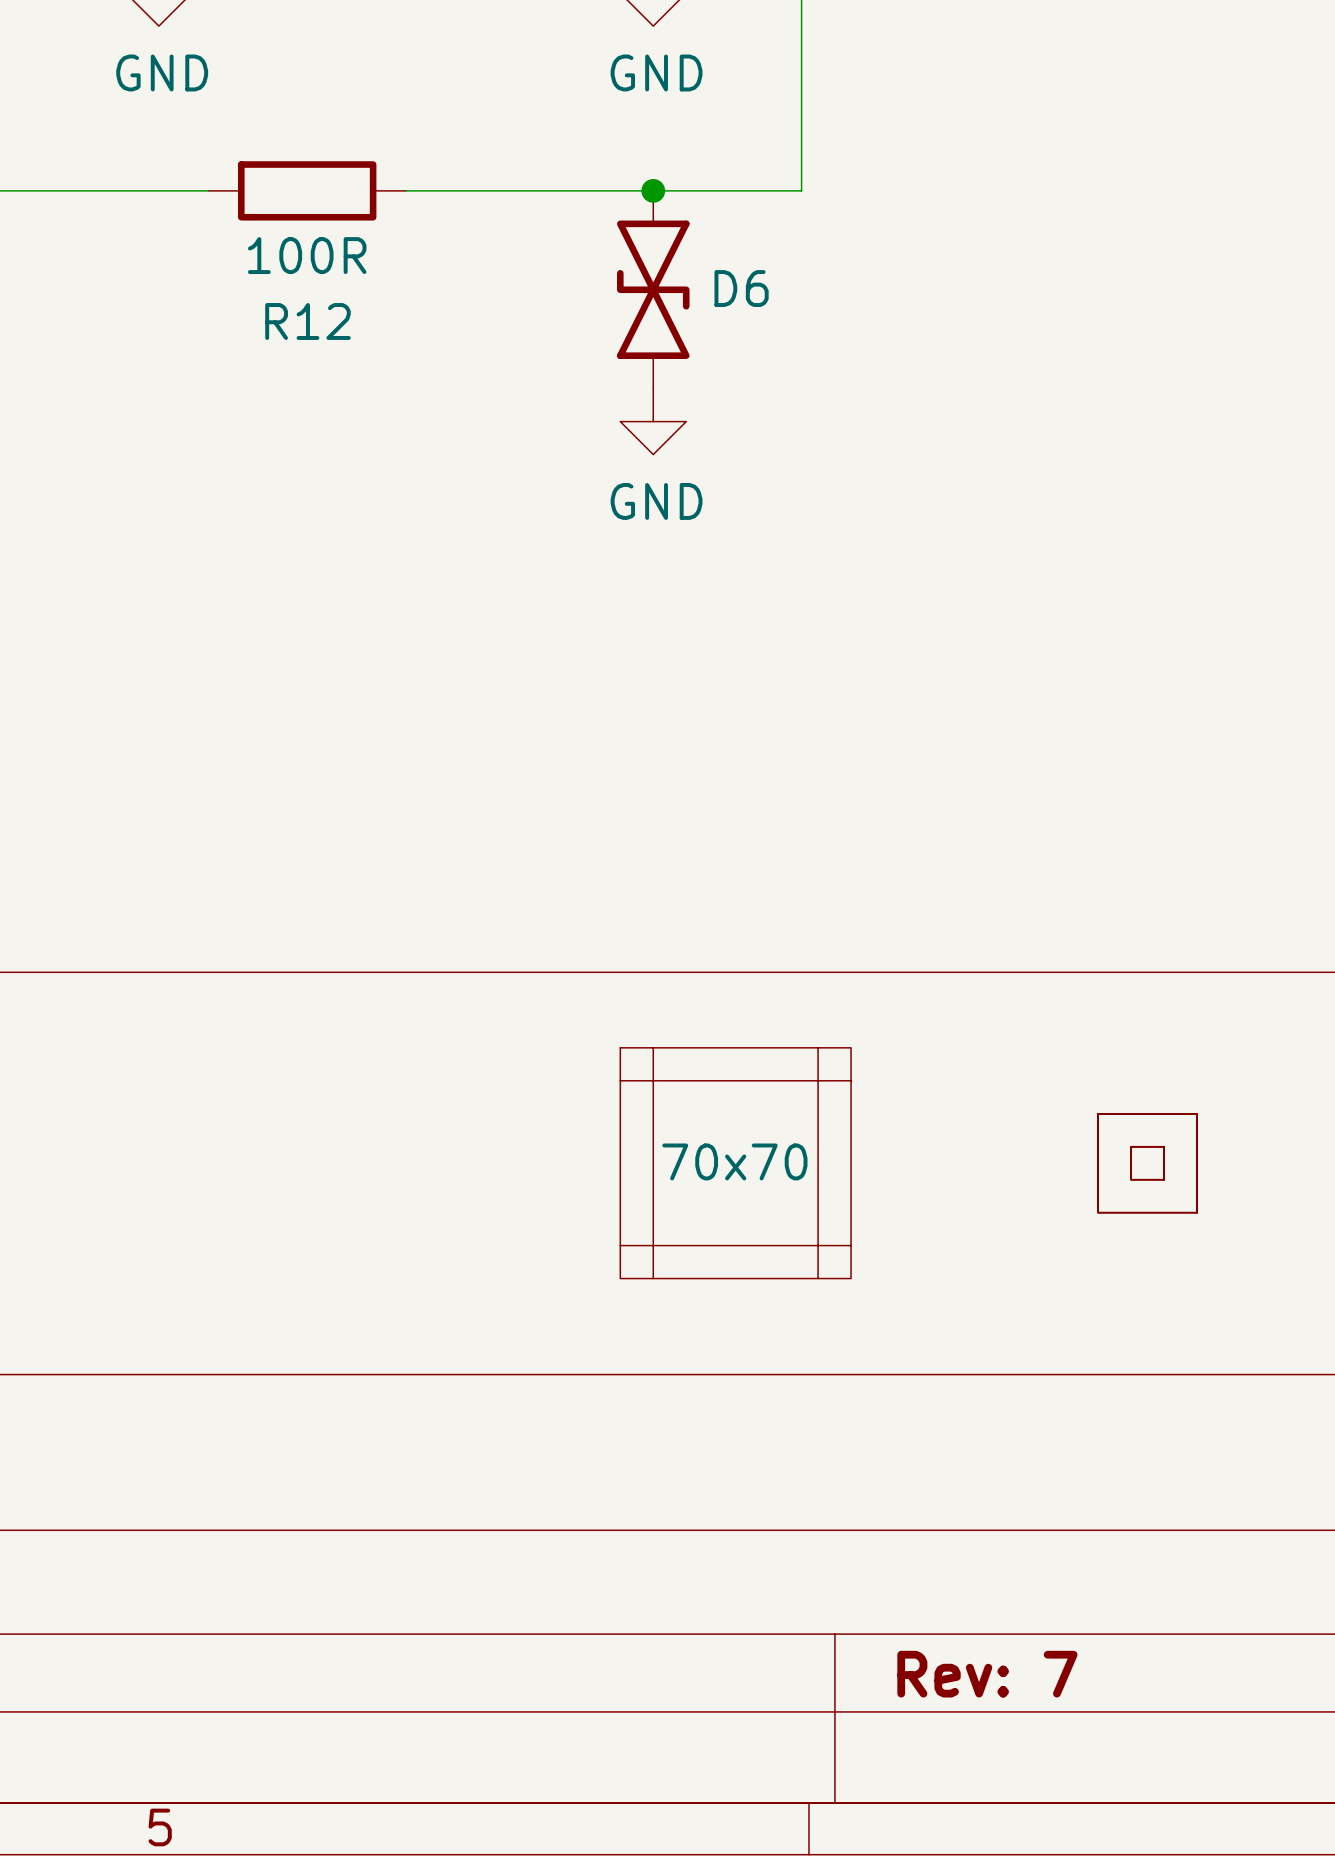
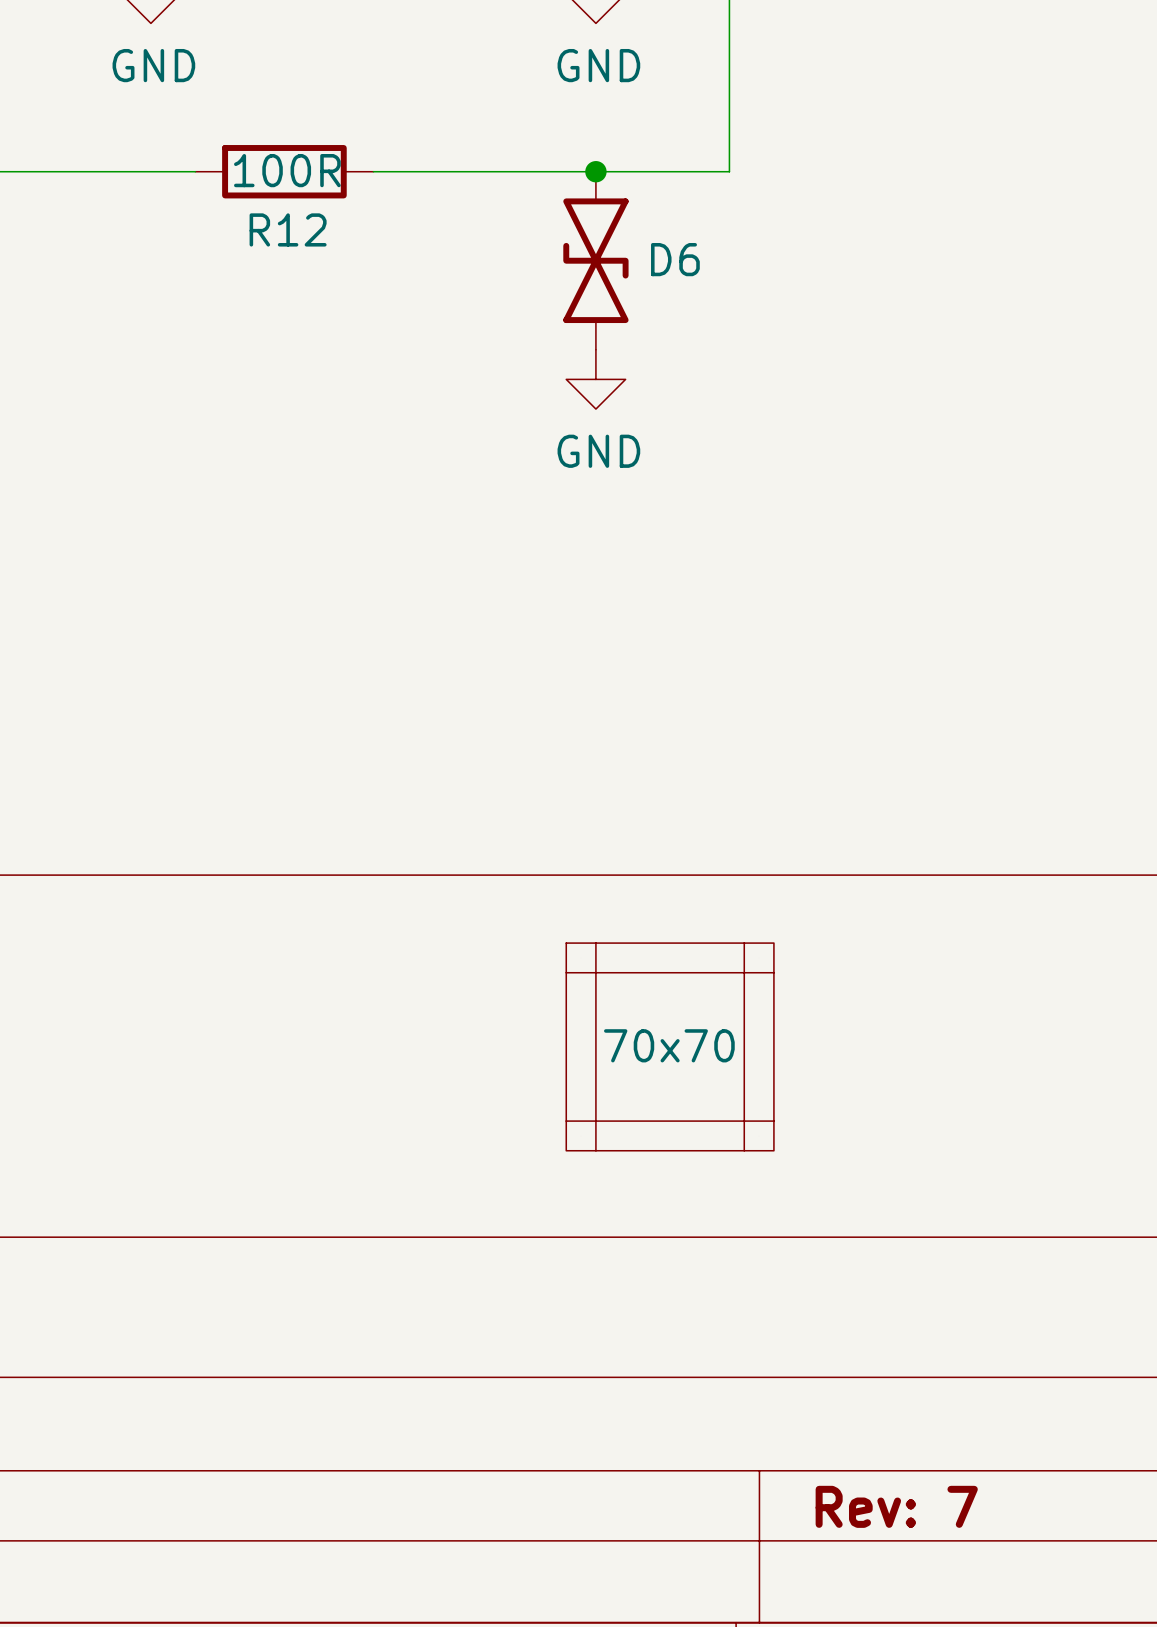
R12 value position: 100R (307, 255) -> 100R (287, 170)
R12 name position: R12 (307, 321) -> R12 (288, 229)
part: (1147, 1163) -> none

